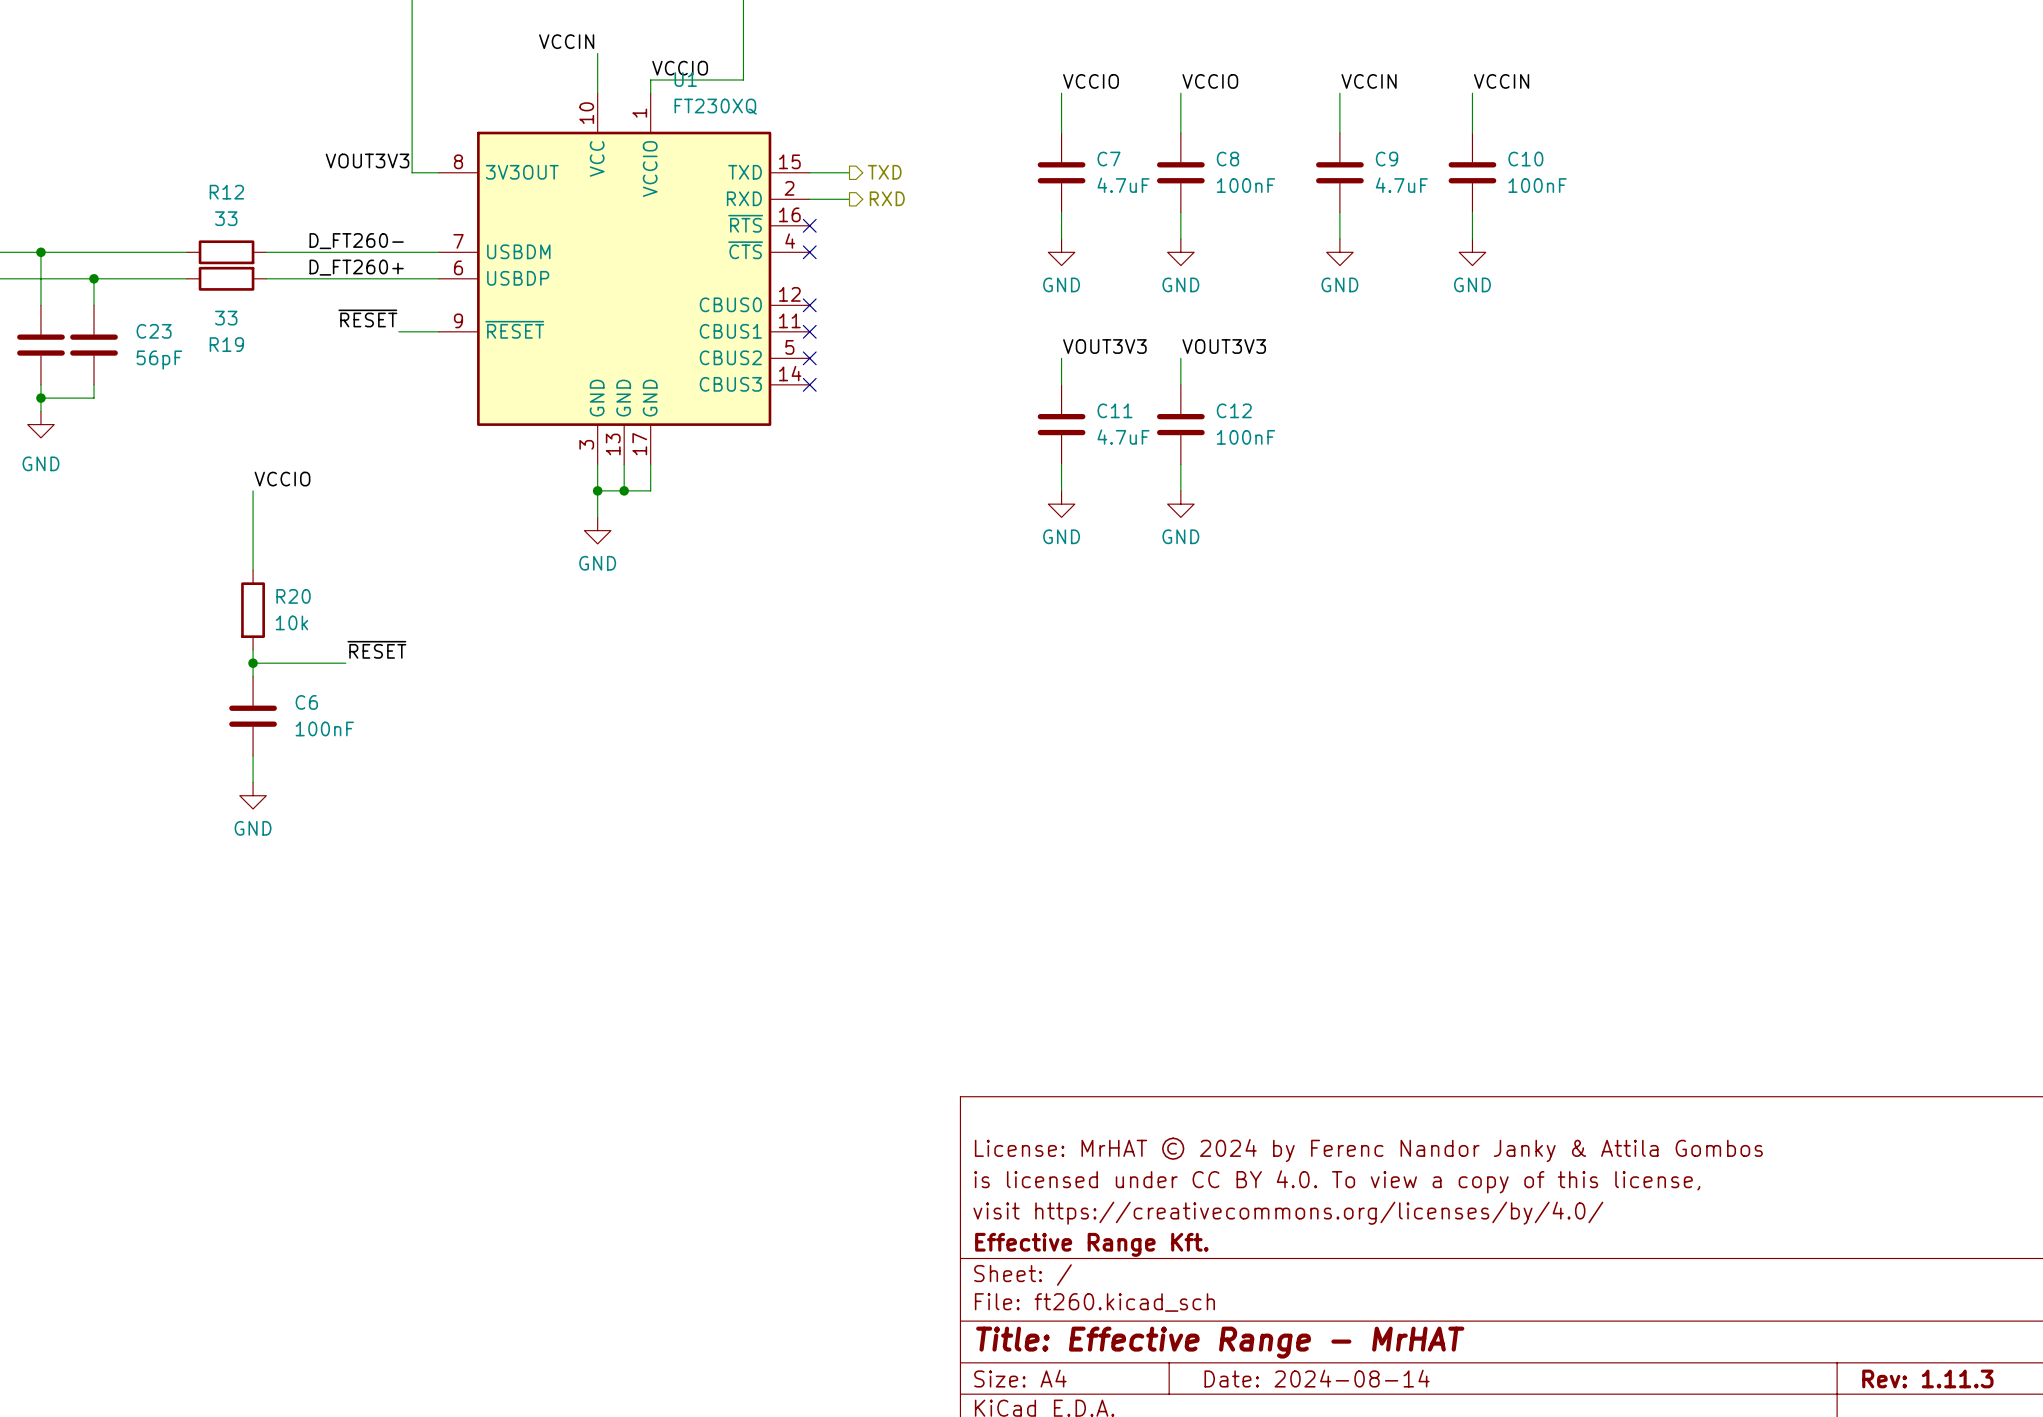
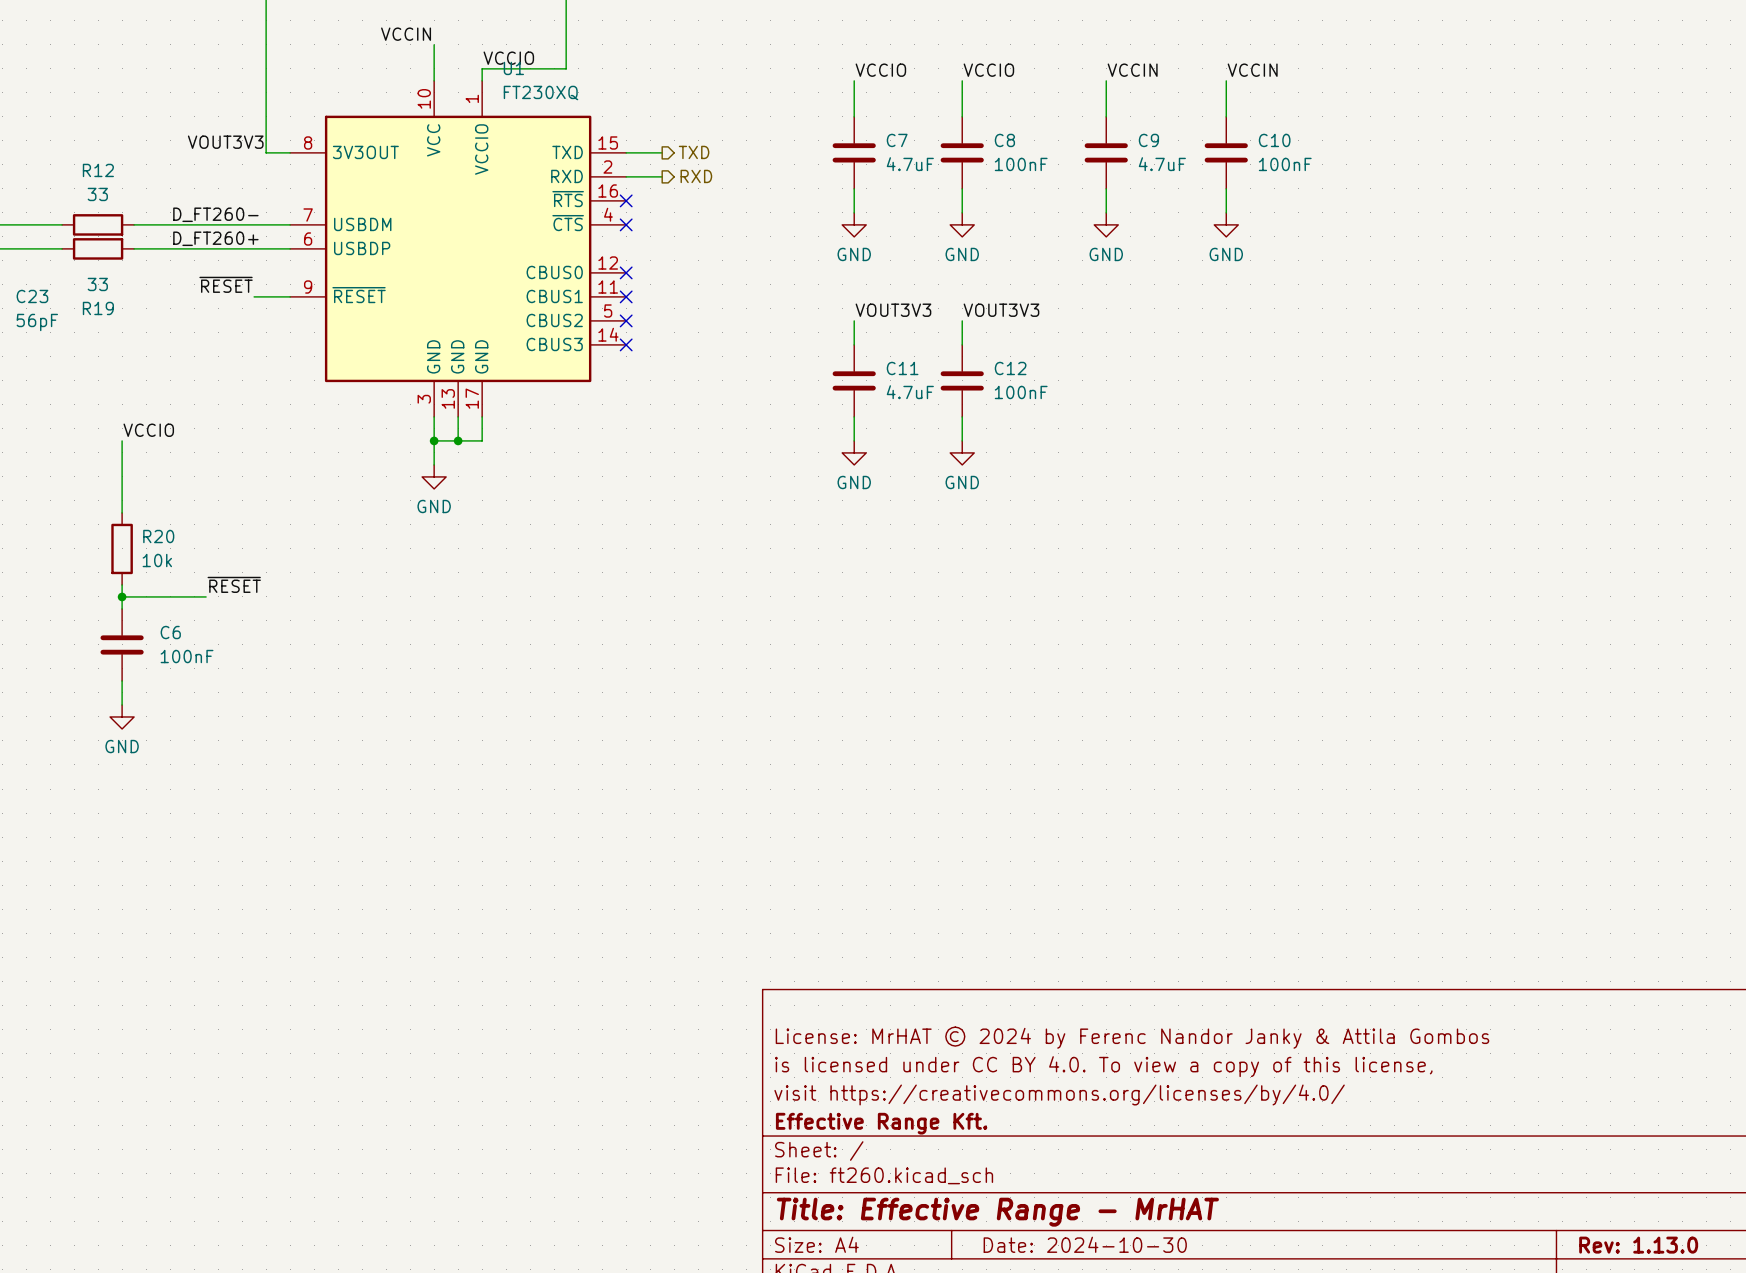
title block: Date: 2024-08-14 (1317, 1378) -> Date: 2024-10-30 (1085, 1244)
title block: Rev: 1.11.3 (1927, 1378) -> Rev: 1.13.0 (1638, 1245)

